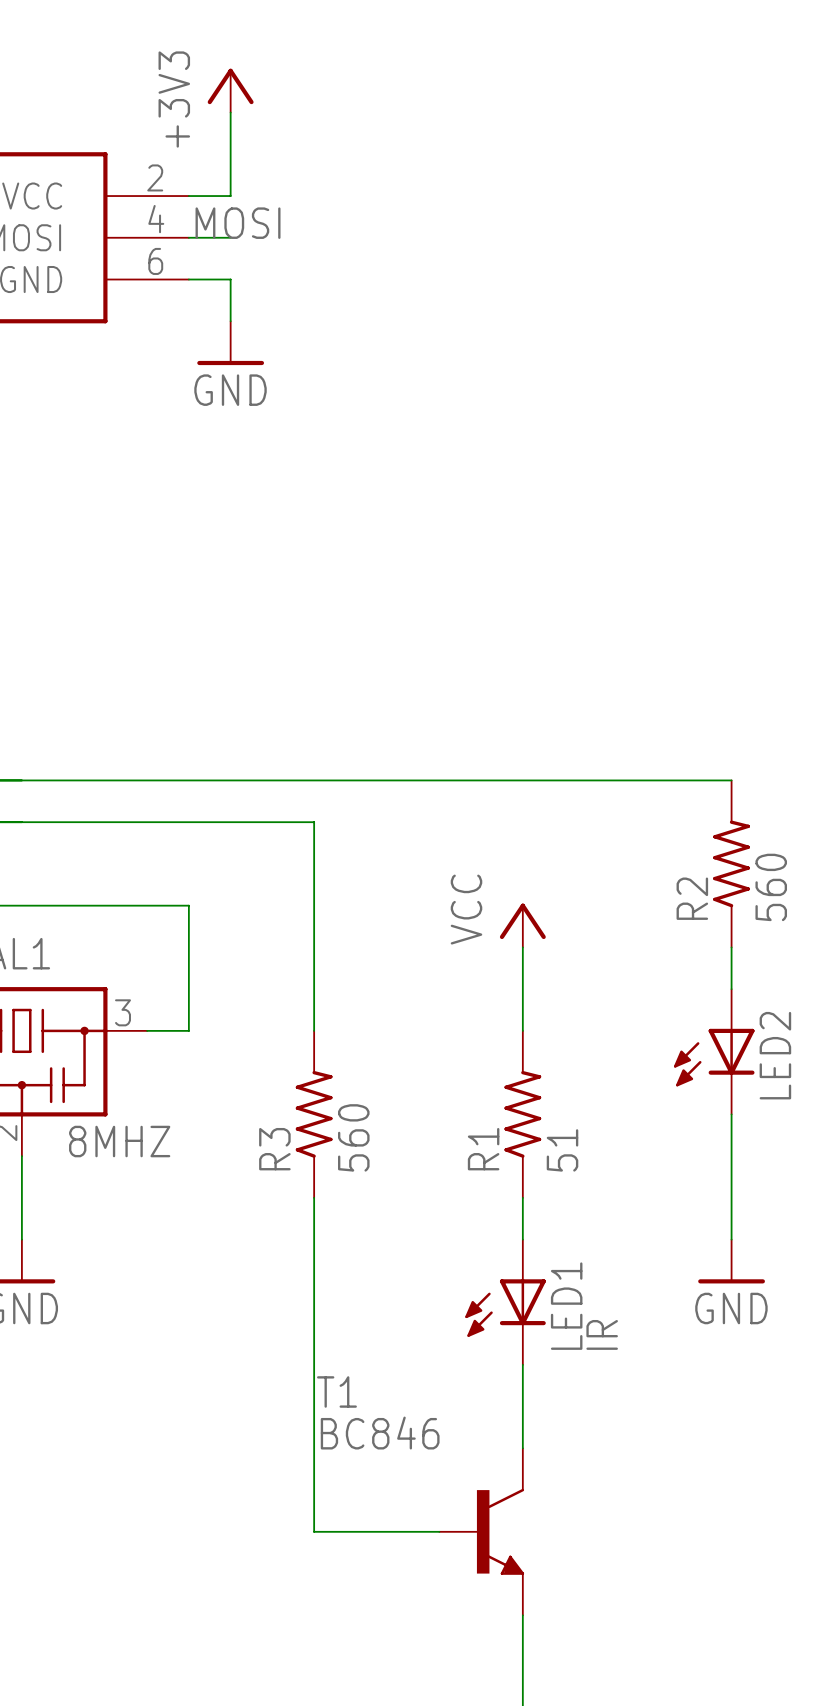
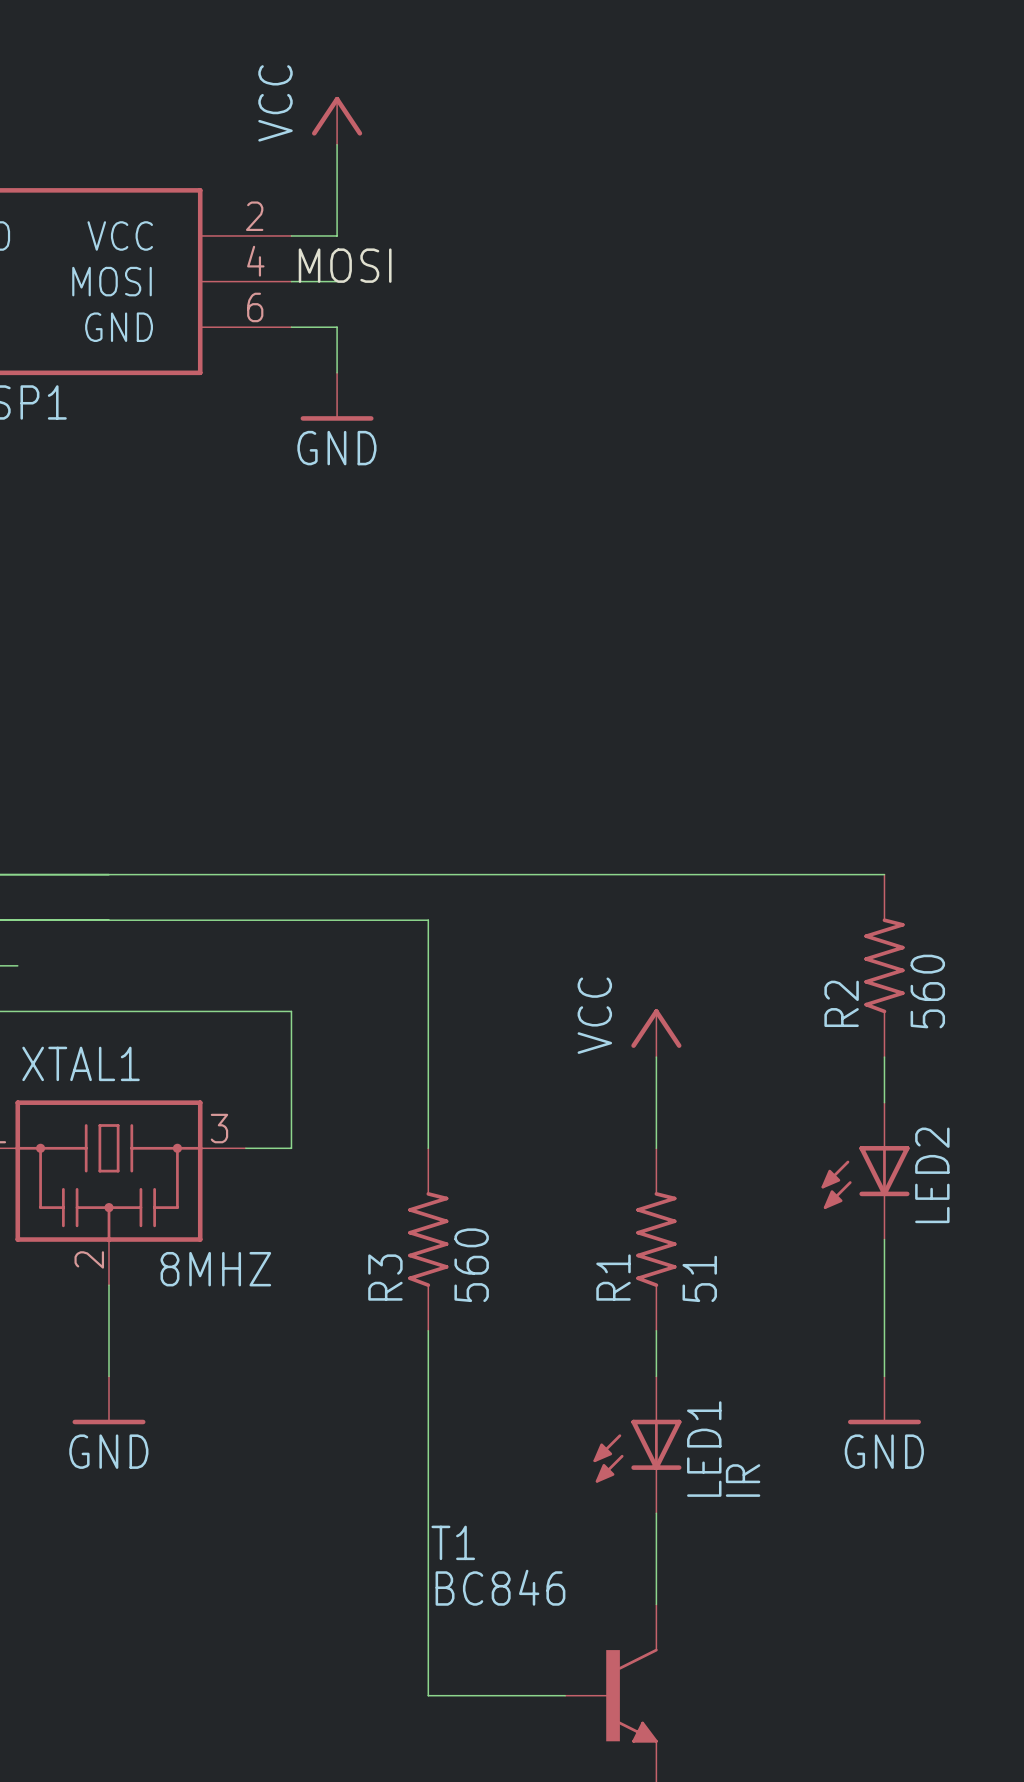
power symbol: +3V3 (230, 90) -> VCC (337, 120)

